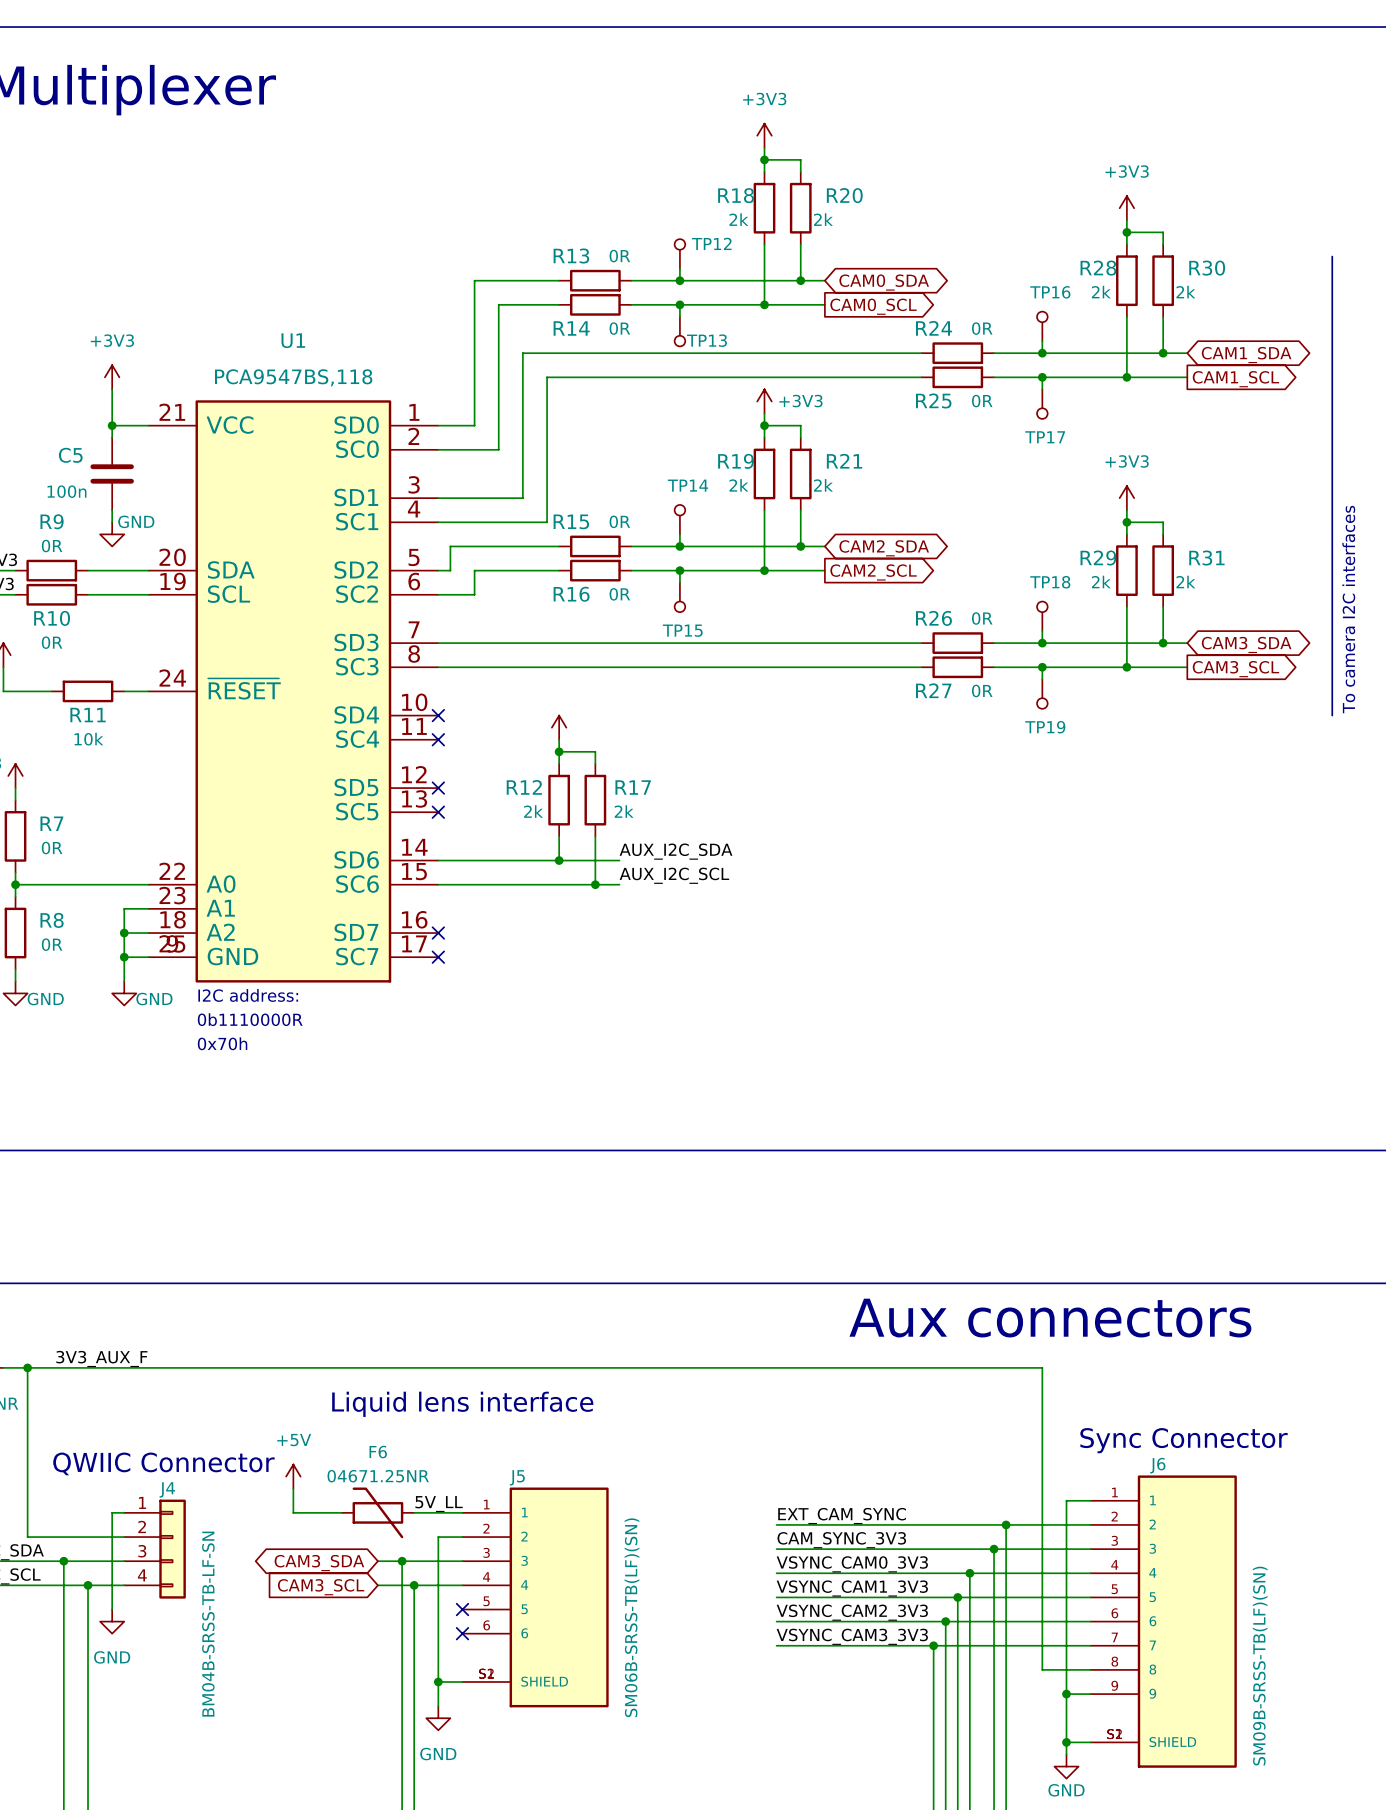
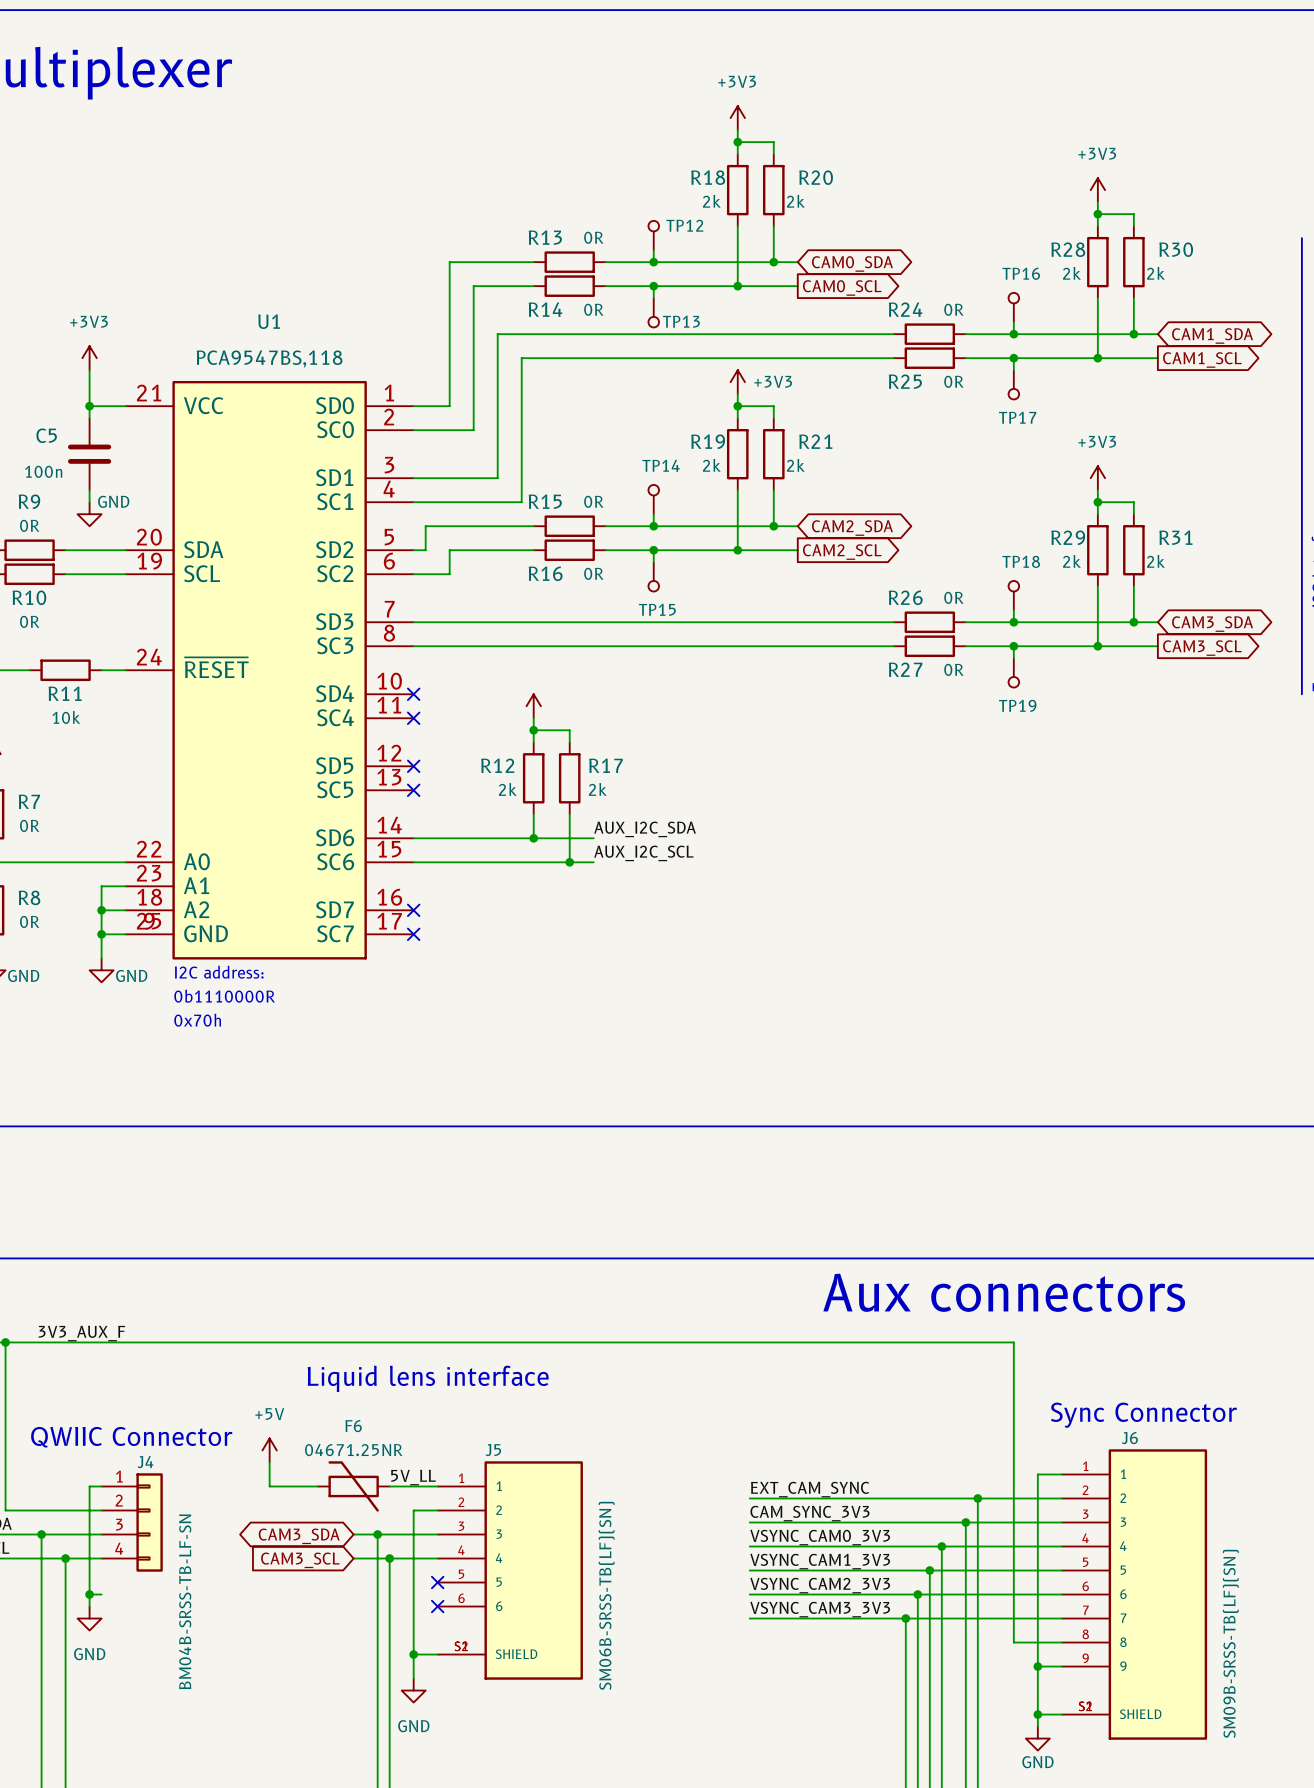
power symbol position: GND (112, 1621) -> GND (89, 1618)
junction: none -> (89, 1594)

